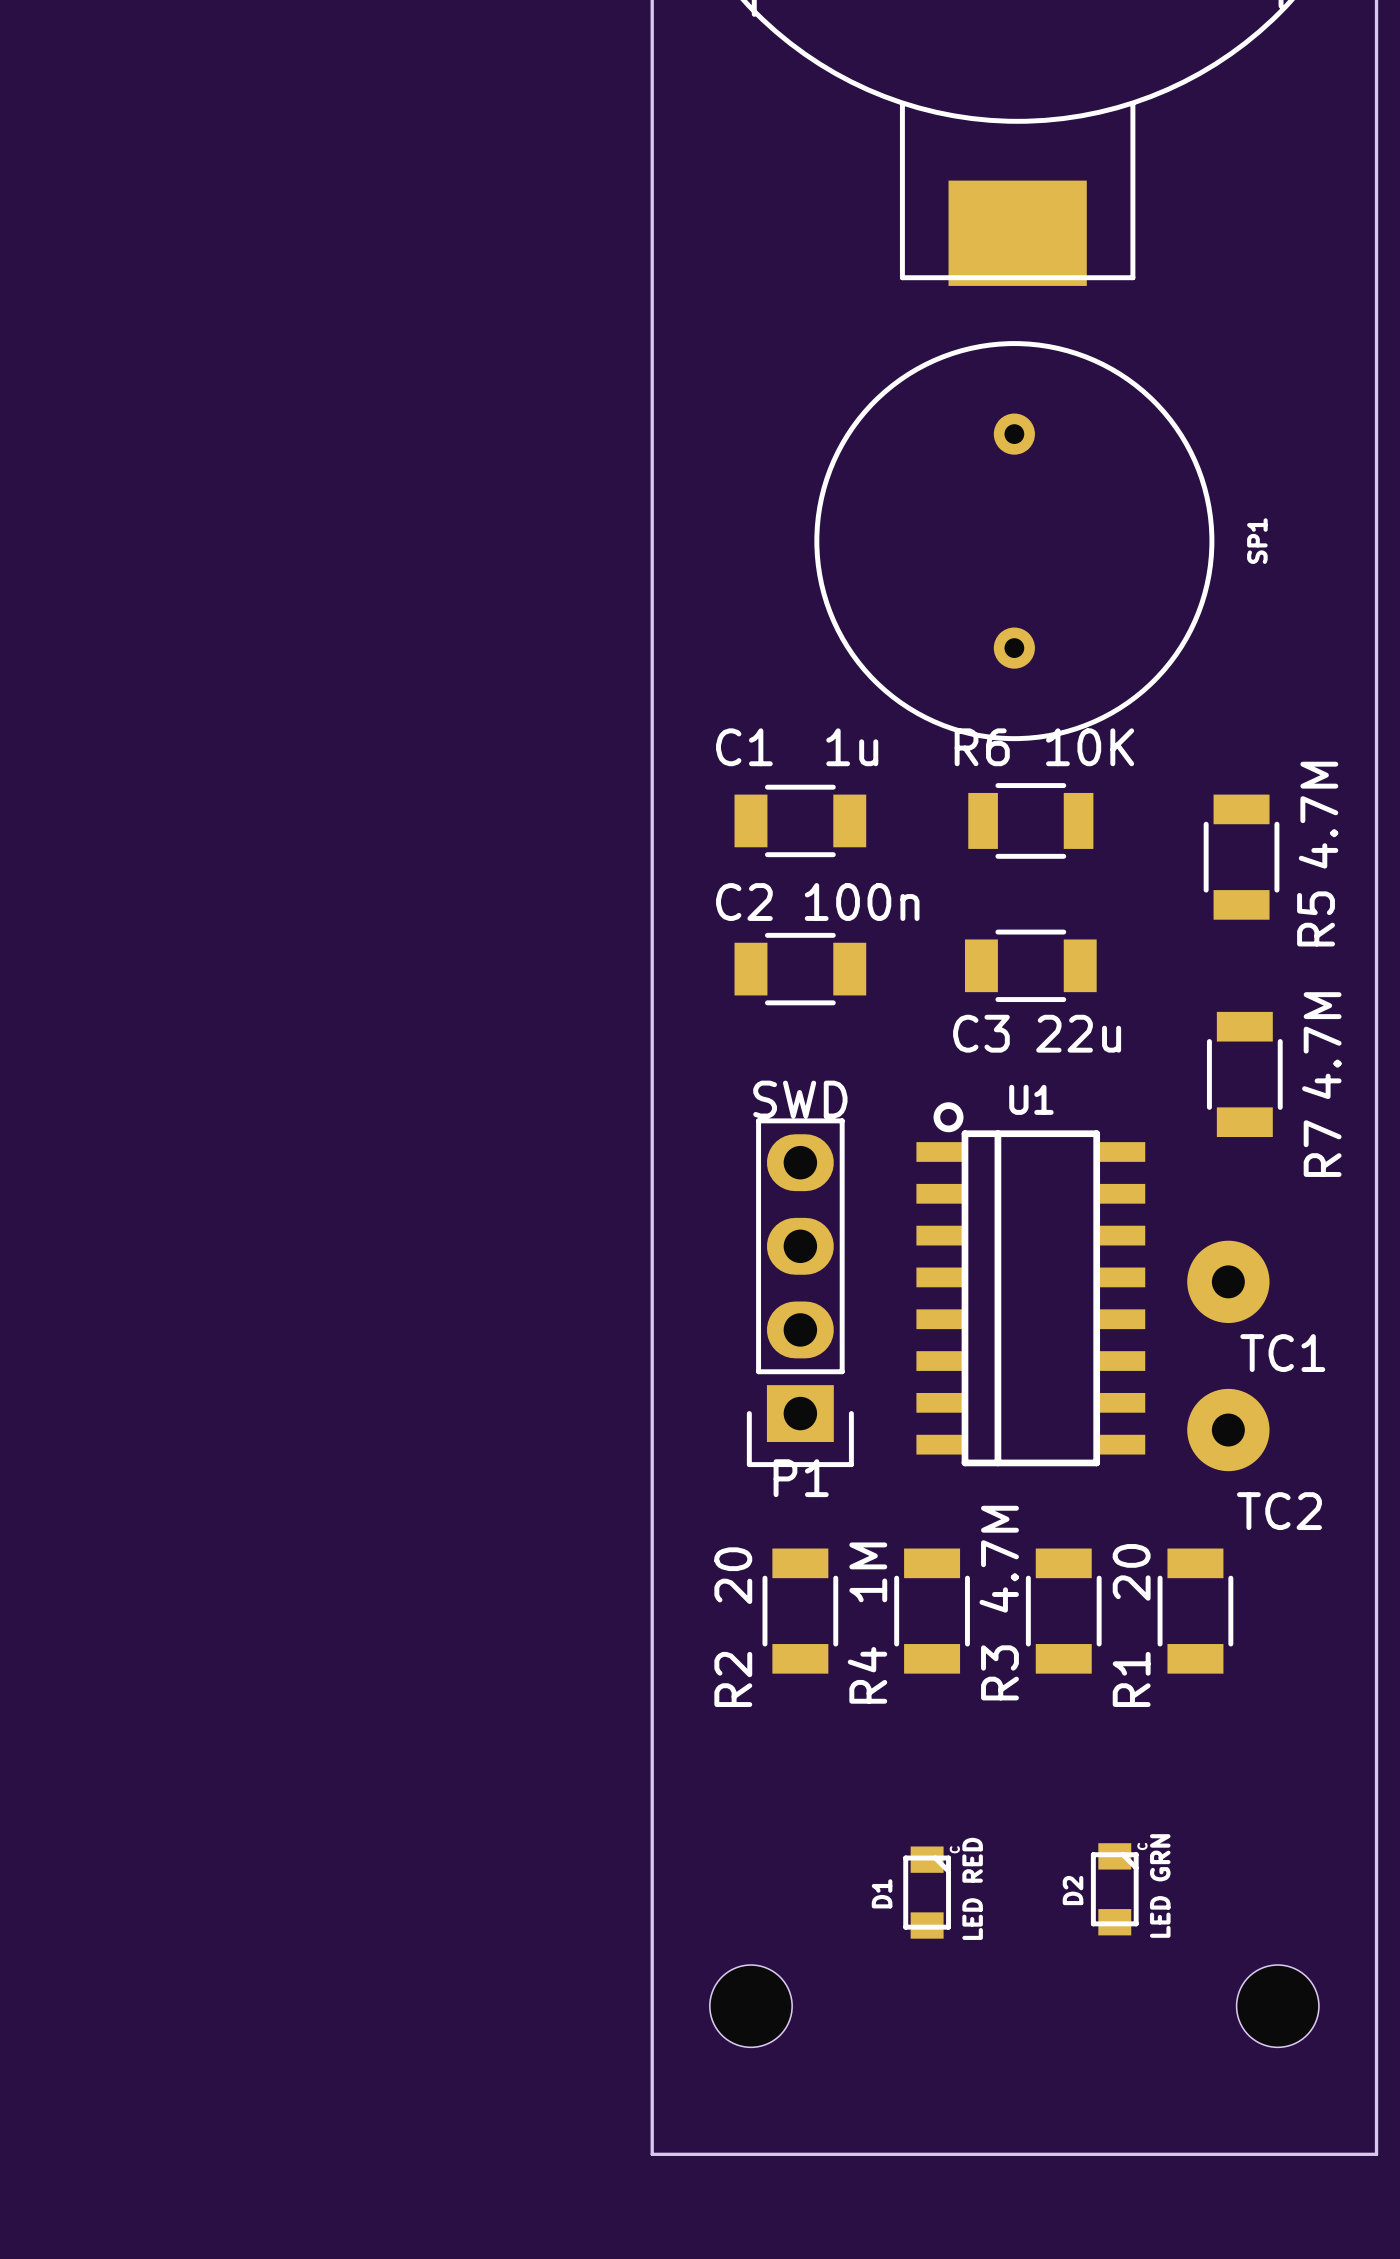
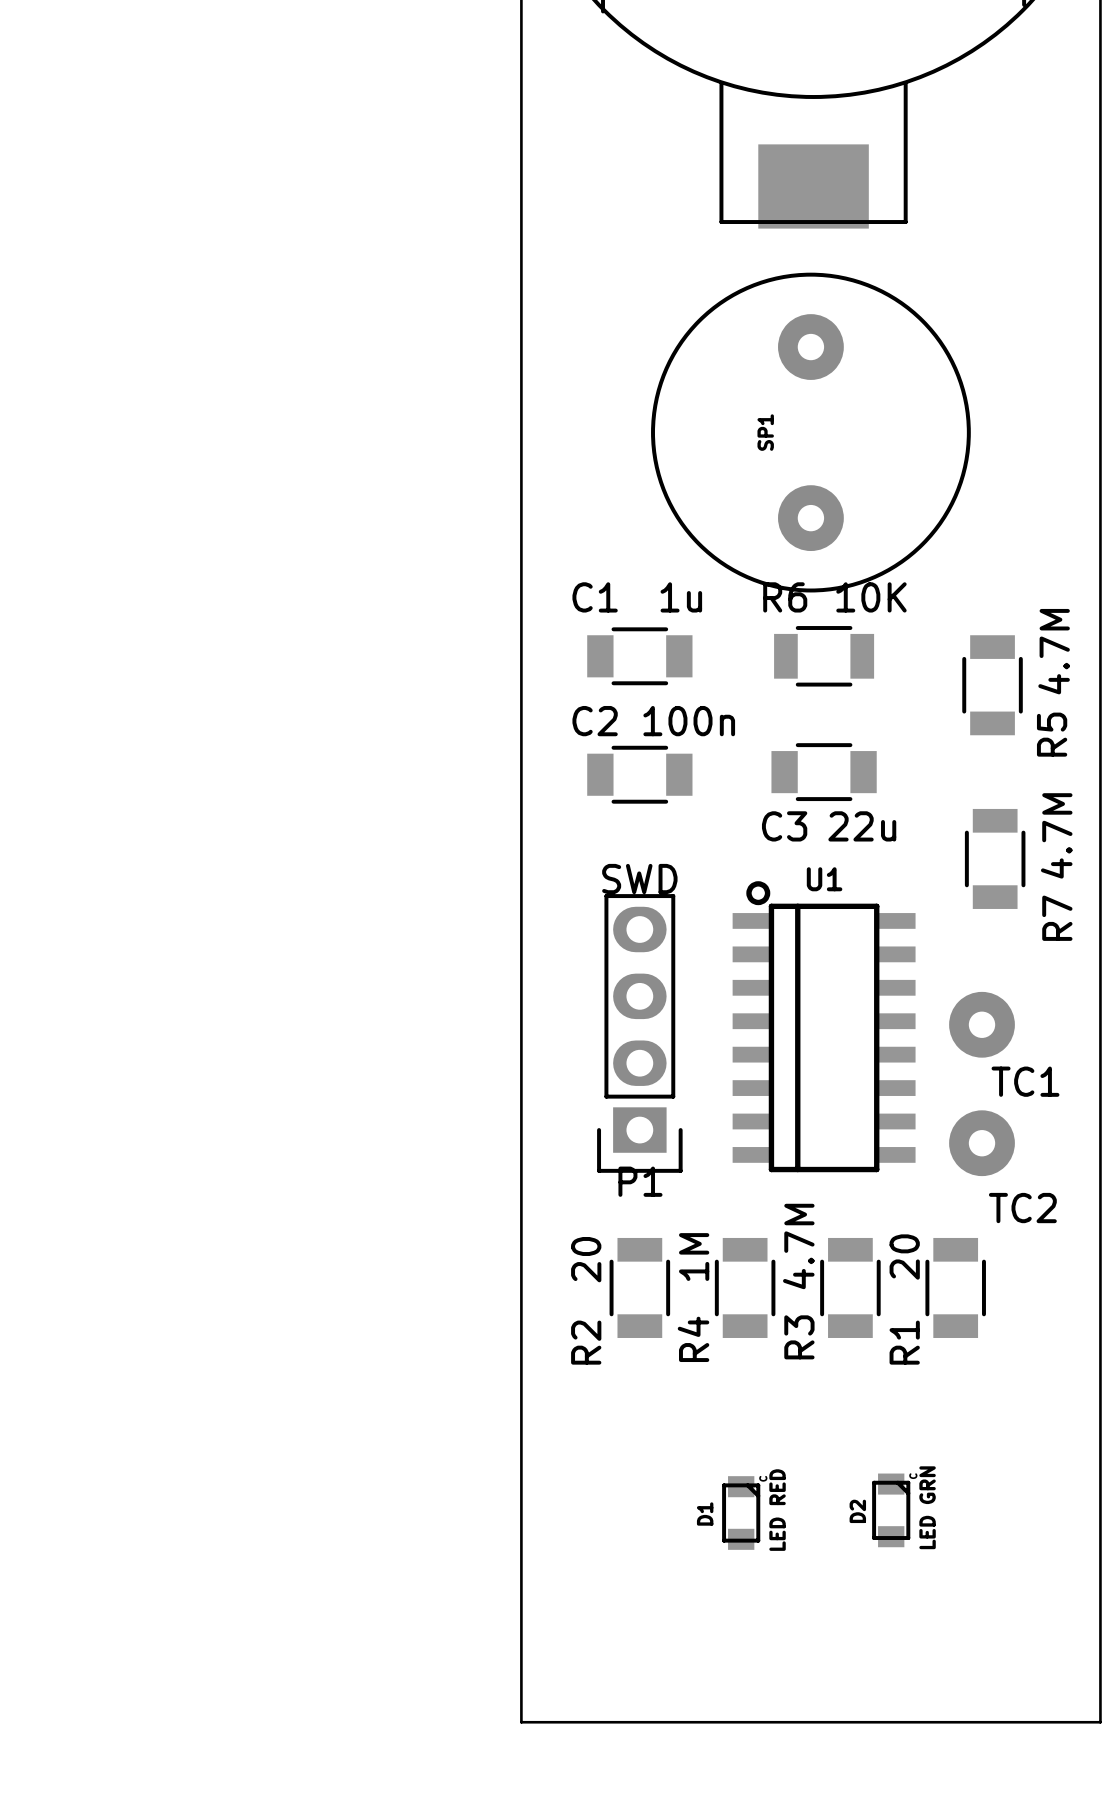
SP1 footprint: [814, 341, 1215, 742] -> [651, 272, 971, 593]
SP1 name position: SP1 (1257, 541) -> SP1 (765, 432)
part: (750, 2006) -> none
part: (1277, 2006) -> none

